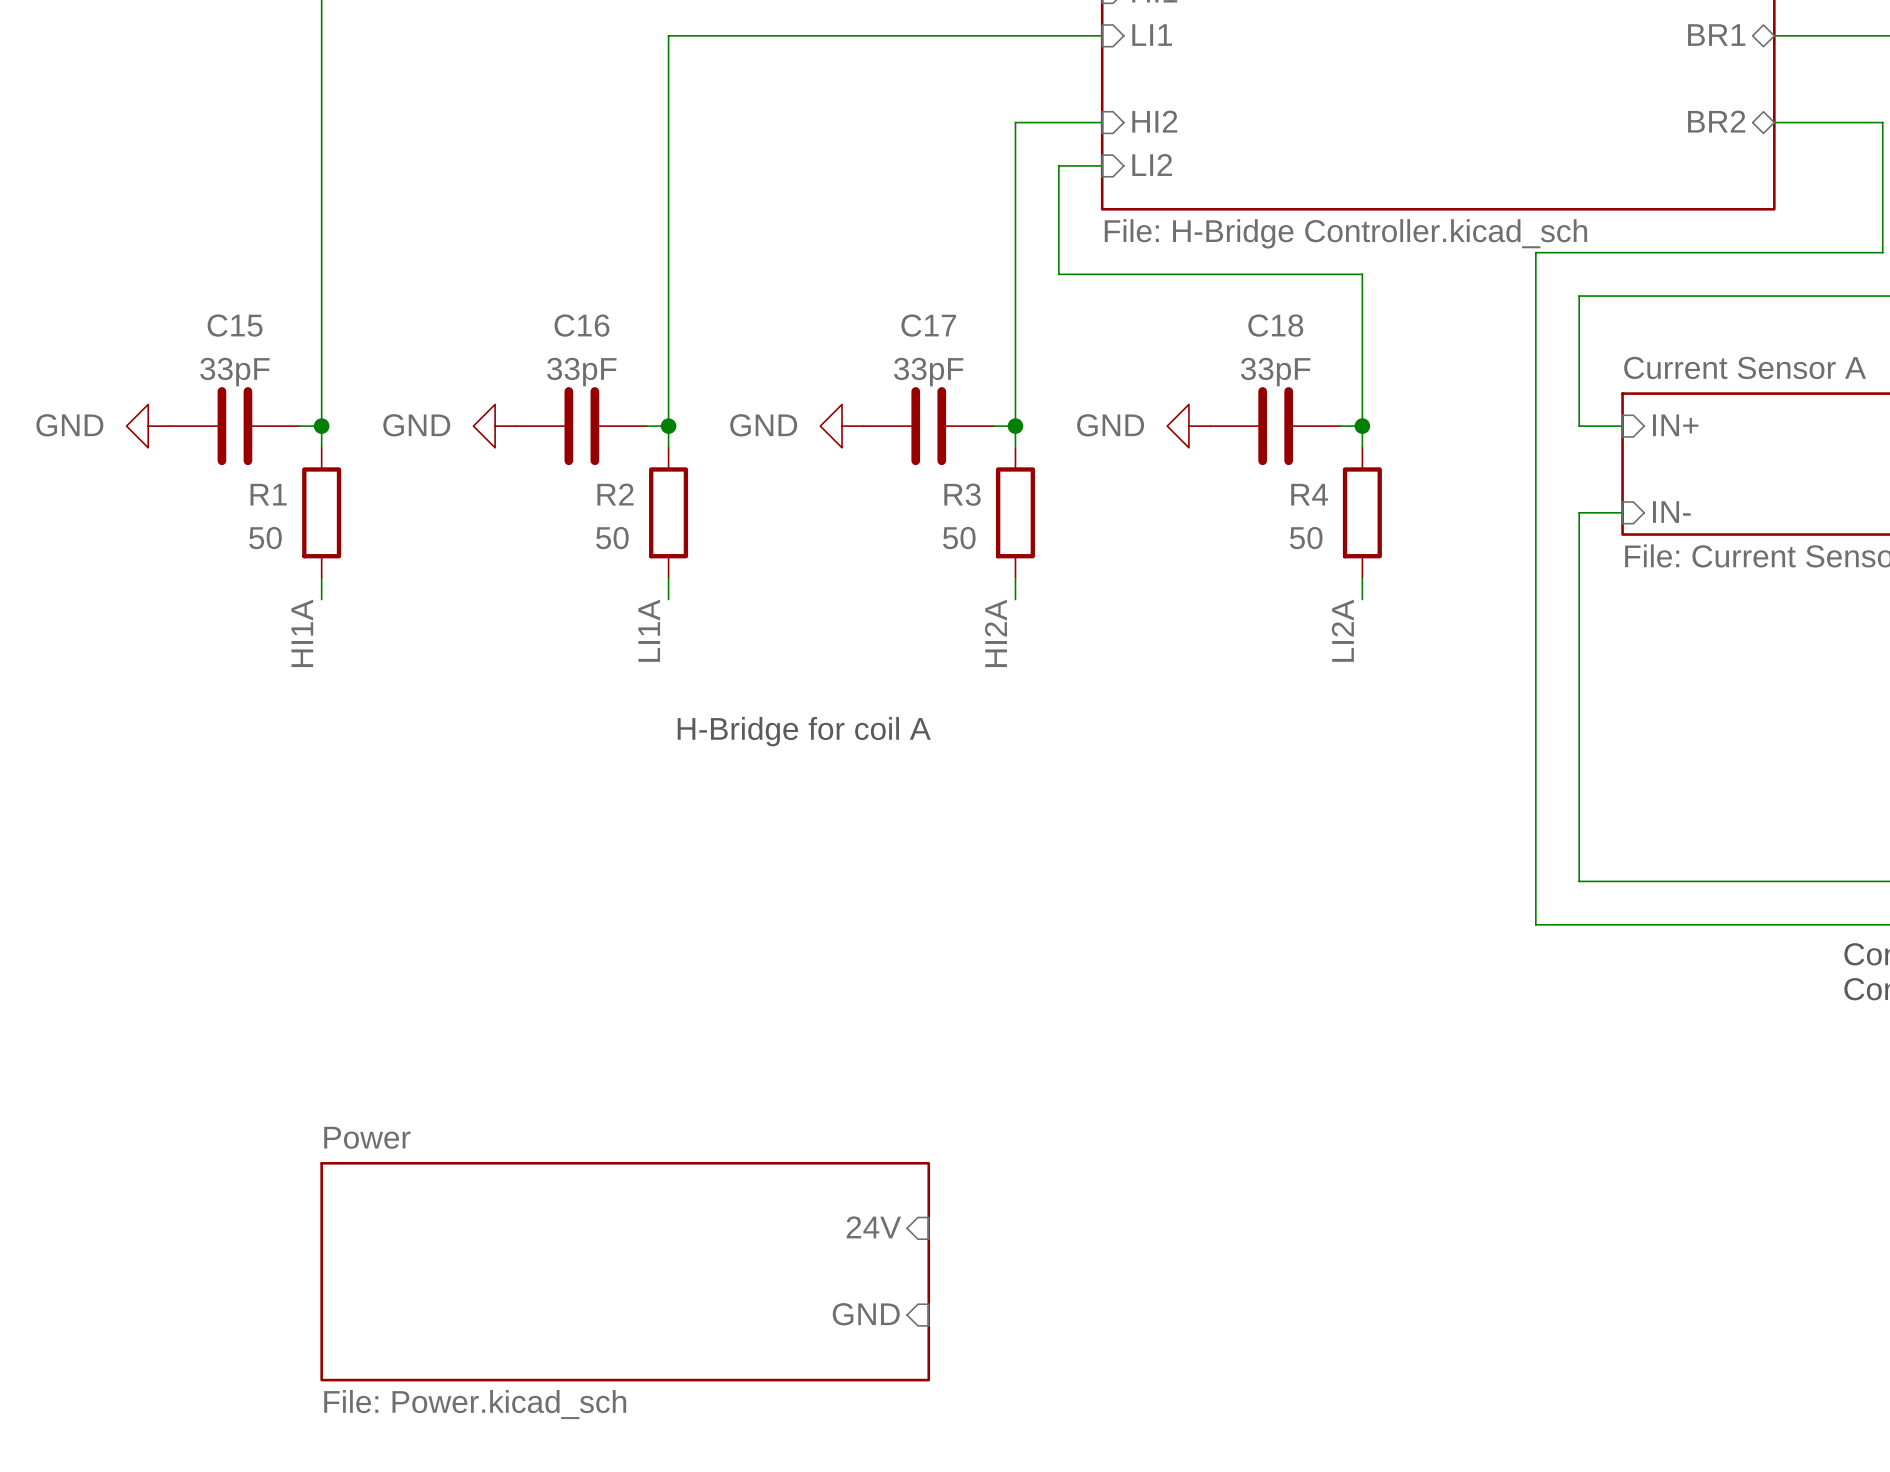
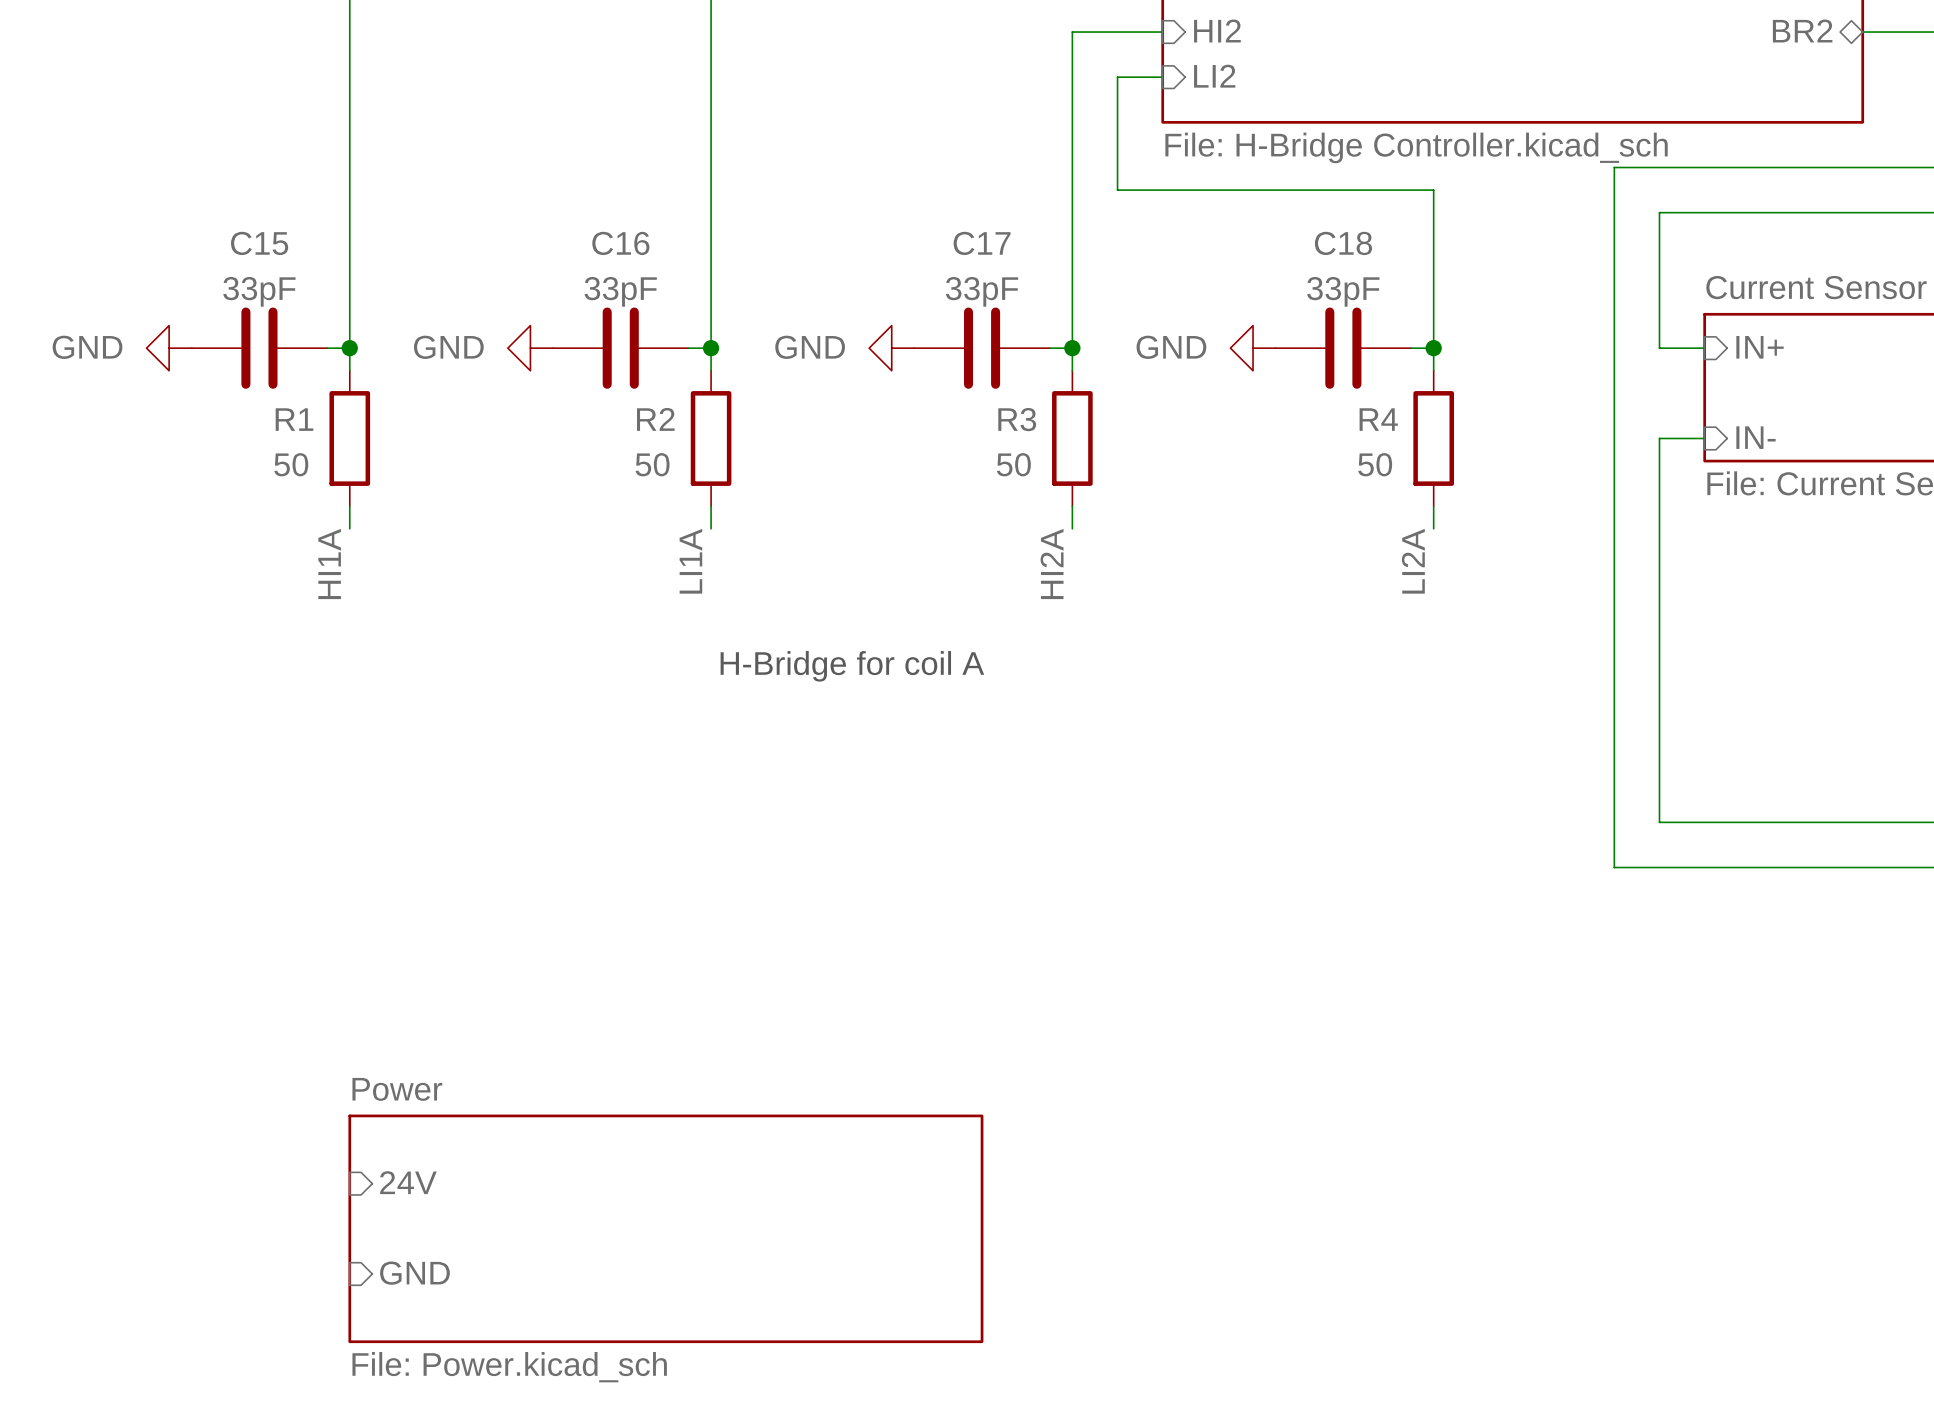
sheet pin: none -> 24V (408, 1182)
sheet pin: 24V (873, 1227) -> none
sheet pin: none -> GND (414, 1273)
sheet pin: GND (866, 1314) -> none

